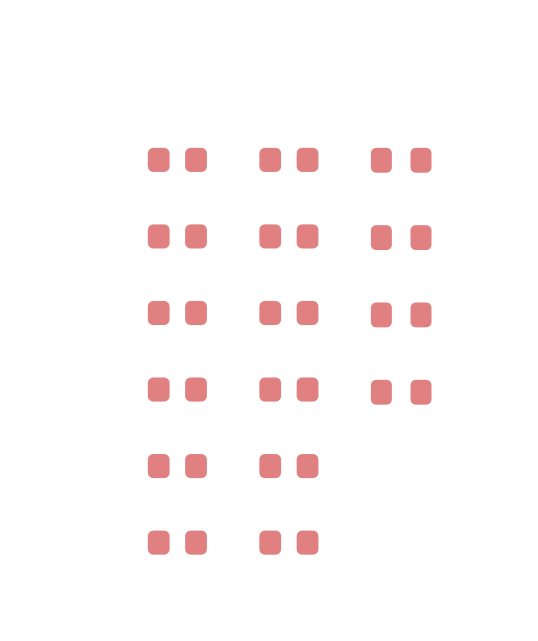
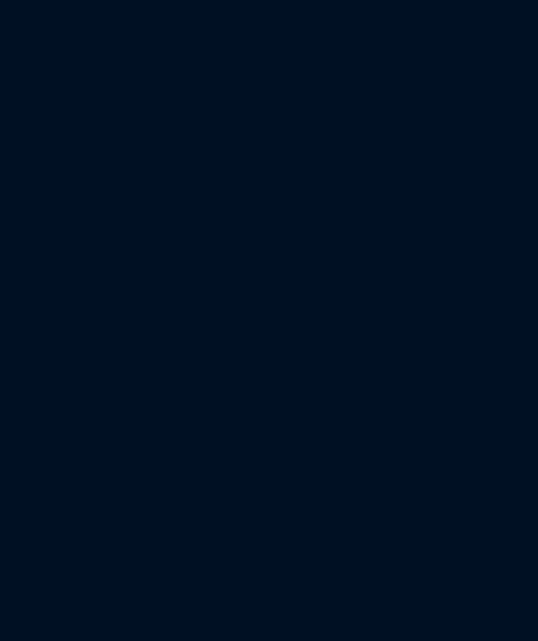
part: (177, 159) -> none
part: (288, 159) -> none
part: (401, 160) -> none
part: (177, 236) -> none
part: (288, 236) -> none
part: (401, 237) -> none
part: (177, 312) -> none
part: (288, 312) -> none
part: (401, 314) -> none
part: (177, 389) -> none
part: (288, 389) -> none
part: (401, 392) -> none
part: (177, 466) -> none
part: (288, 466) -> none
part: (177, 542) -> none
part: (288, 542) -> none

